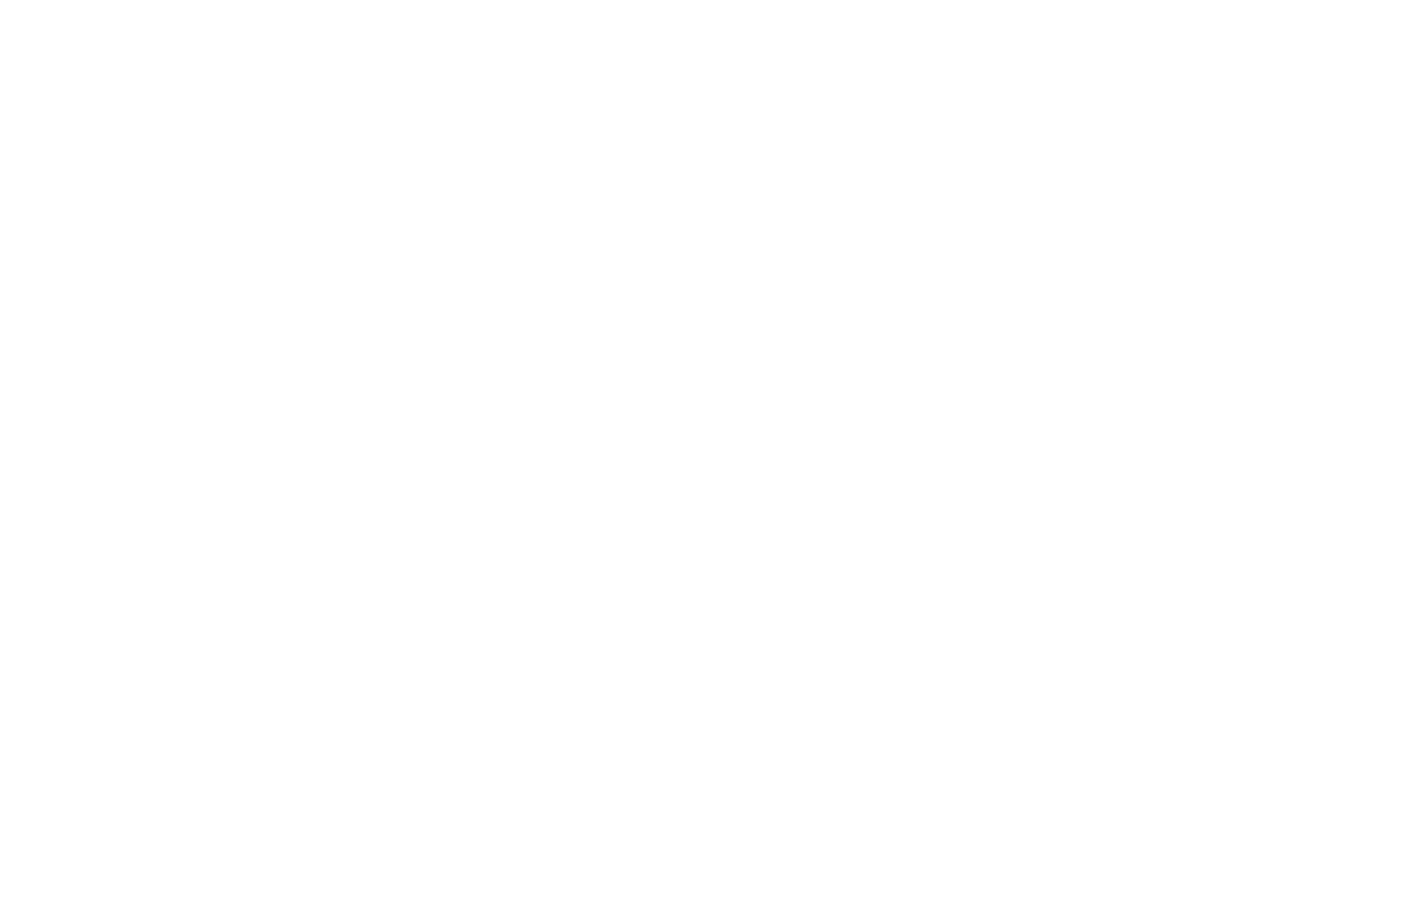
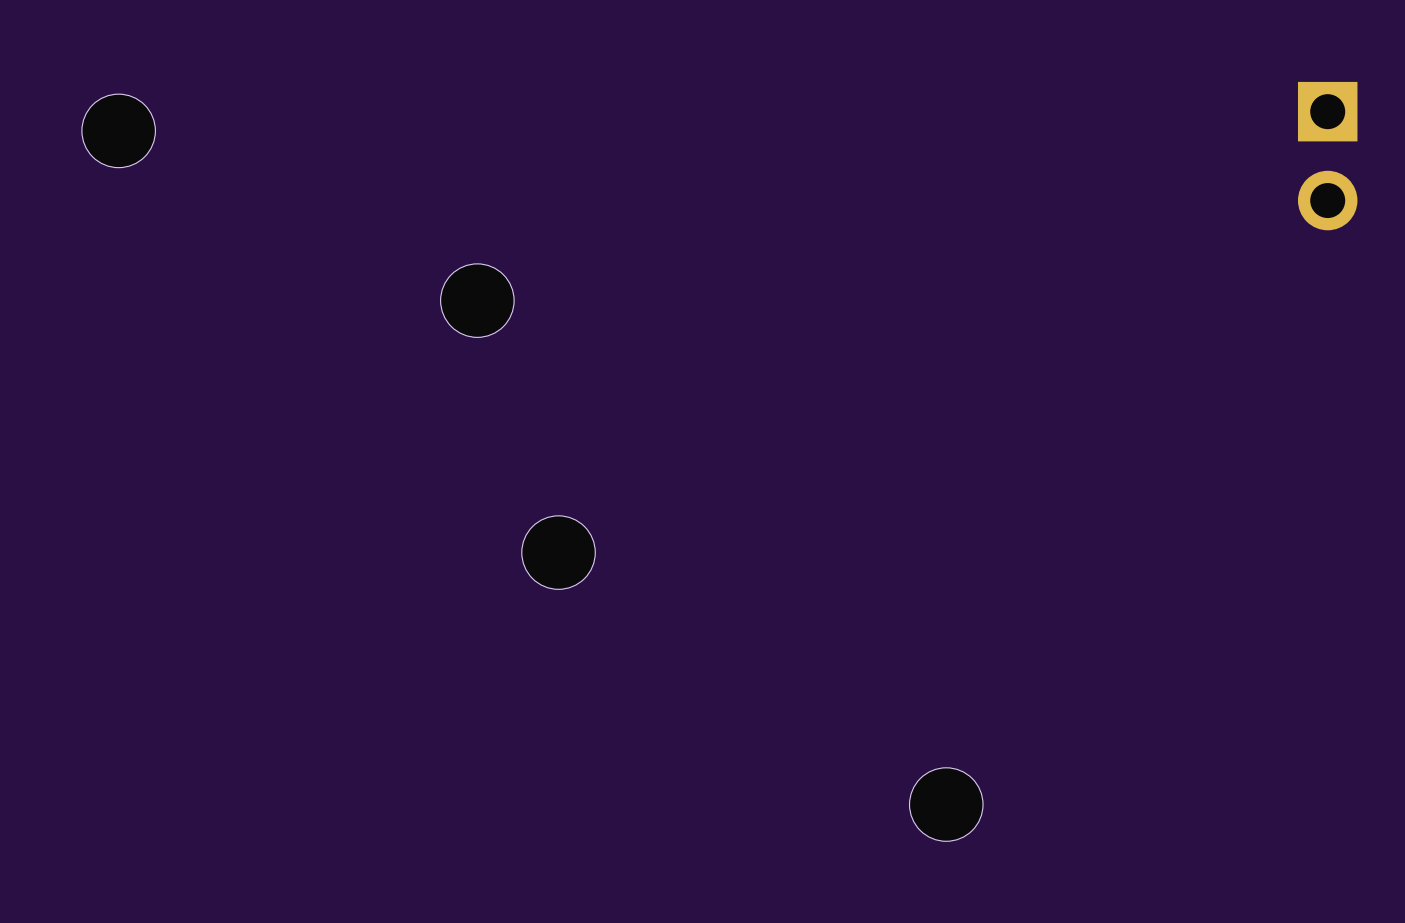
part: none -> (118, 130)
part: none -> (1327, 156)
part: none -> (477, 300)
part: none -> (558, 552)
part: none -> (946, 804)

